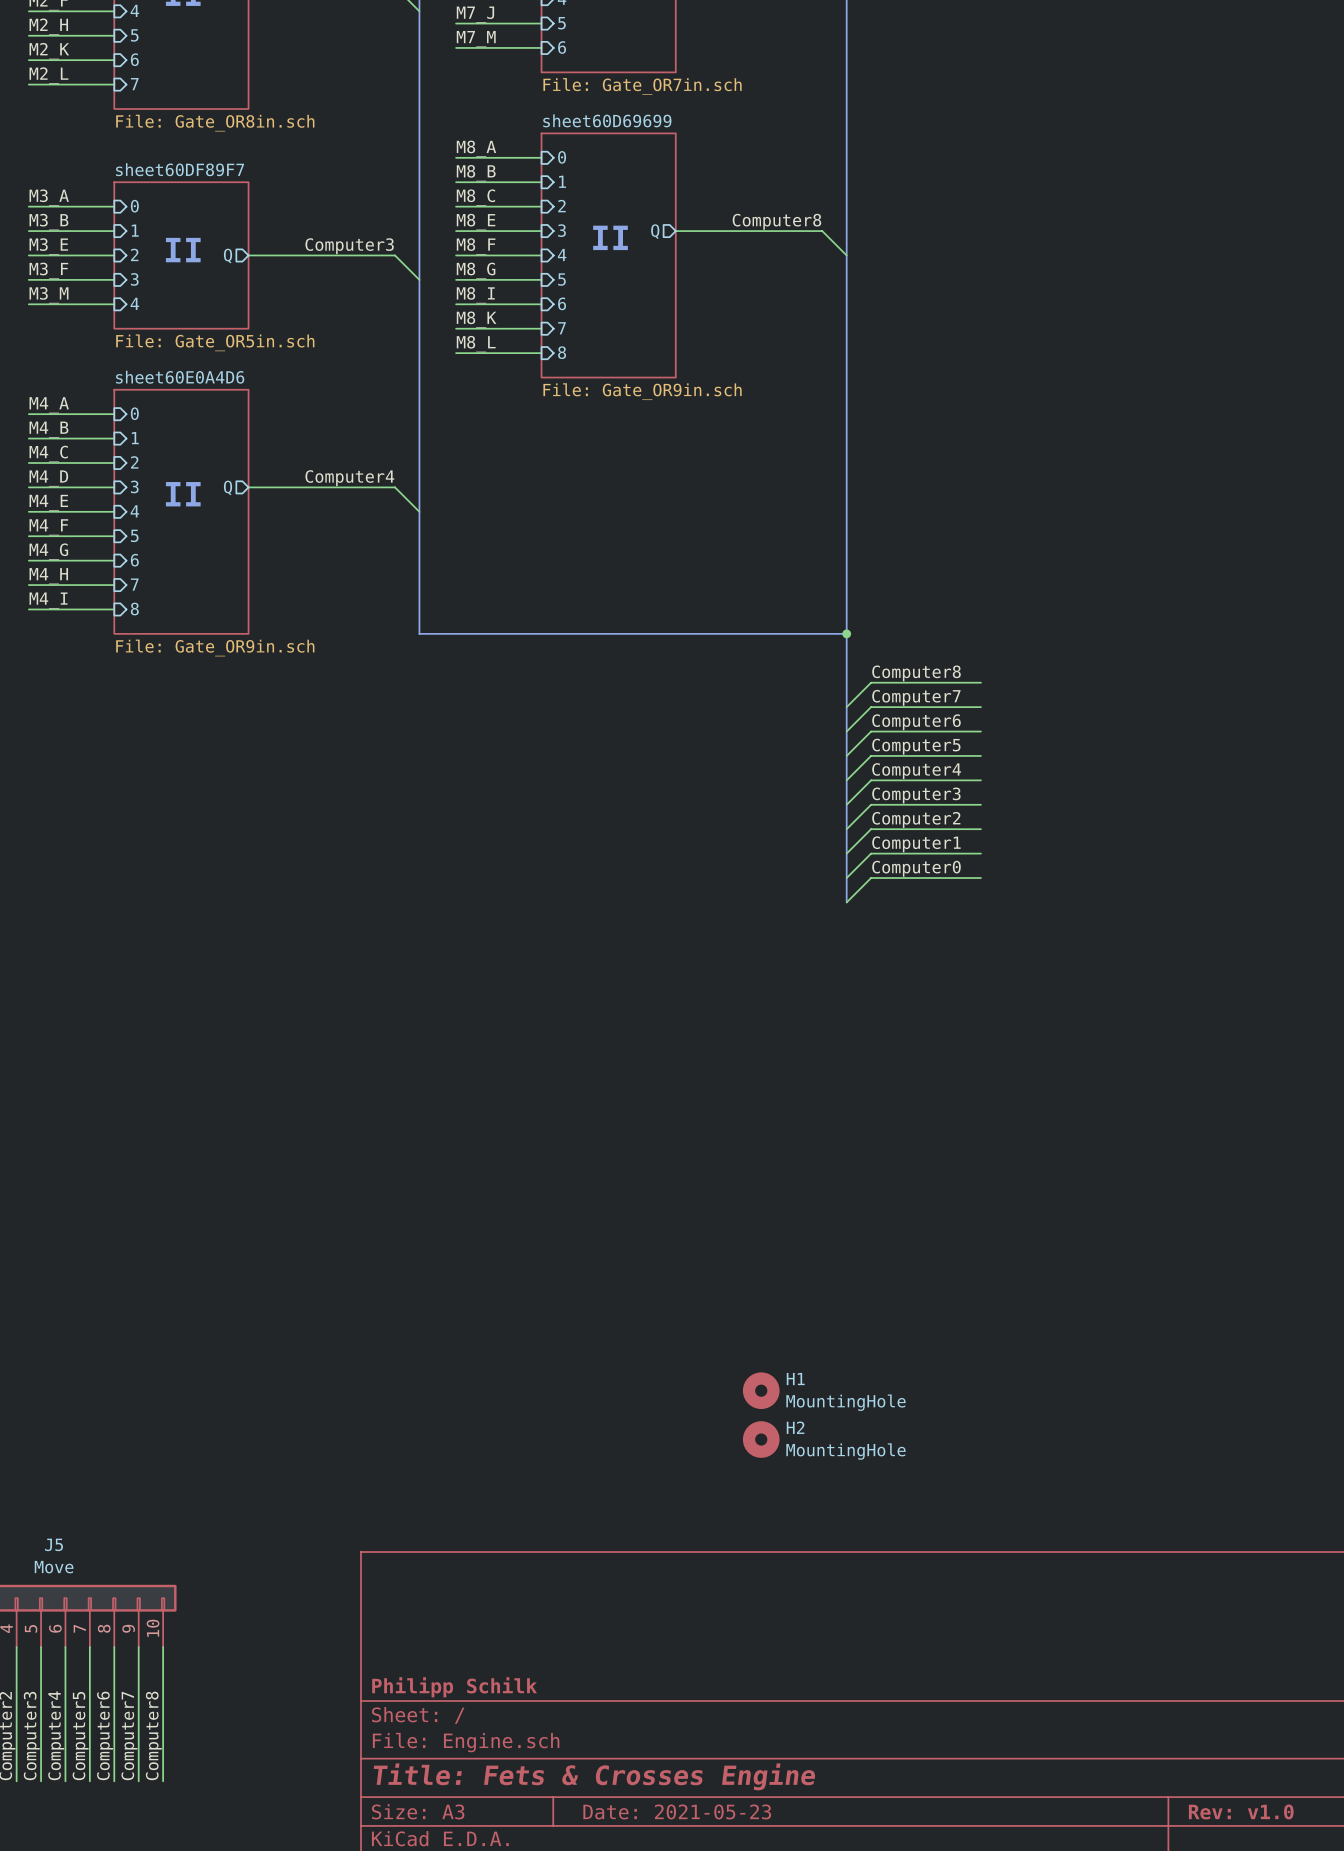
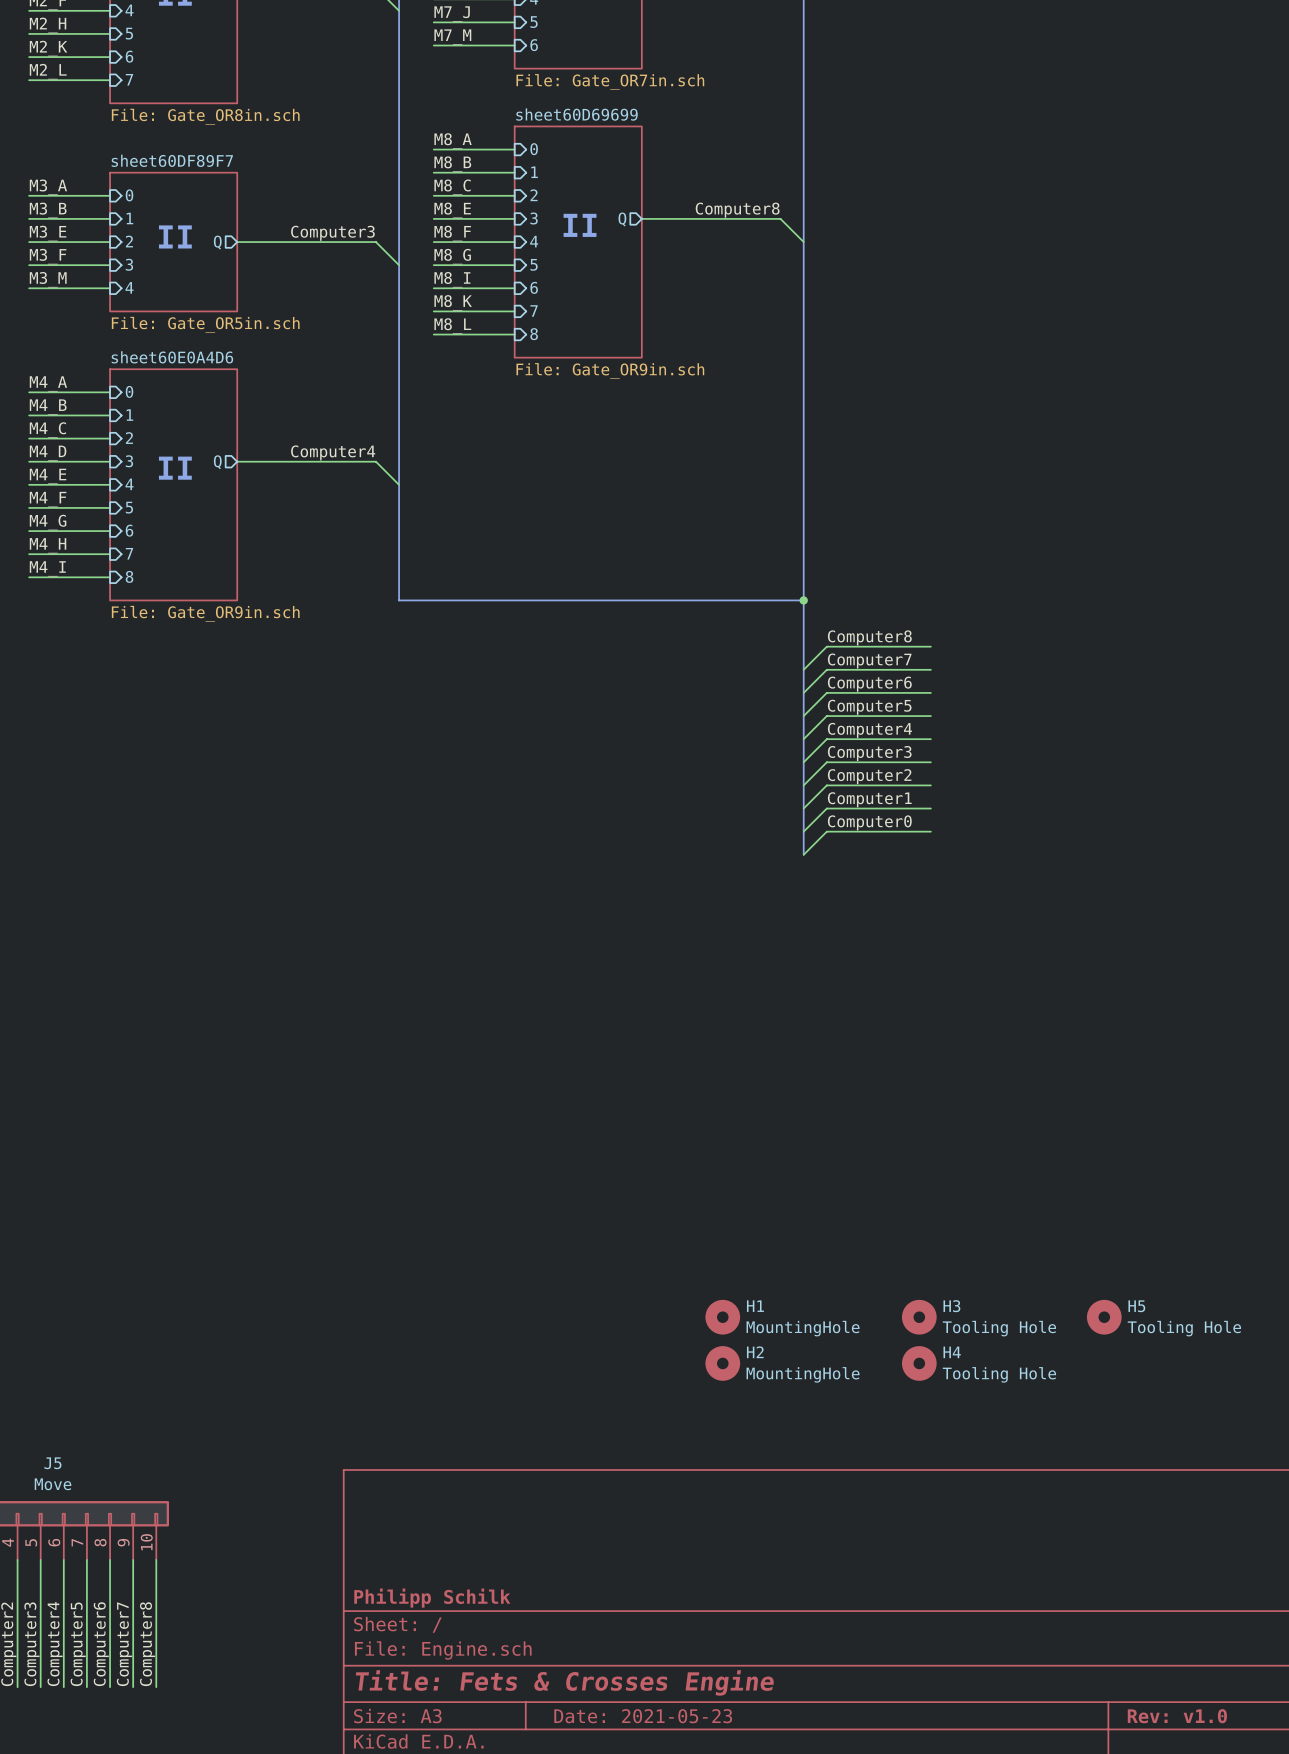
H3: none -> Tooling Hole (919, 1317)
H5: none -> Tooling Hole (1104, 1317)
H4: none -> Tooling Hole (919, 1363)

